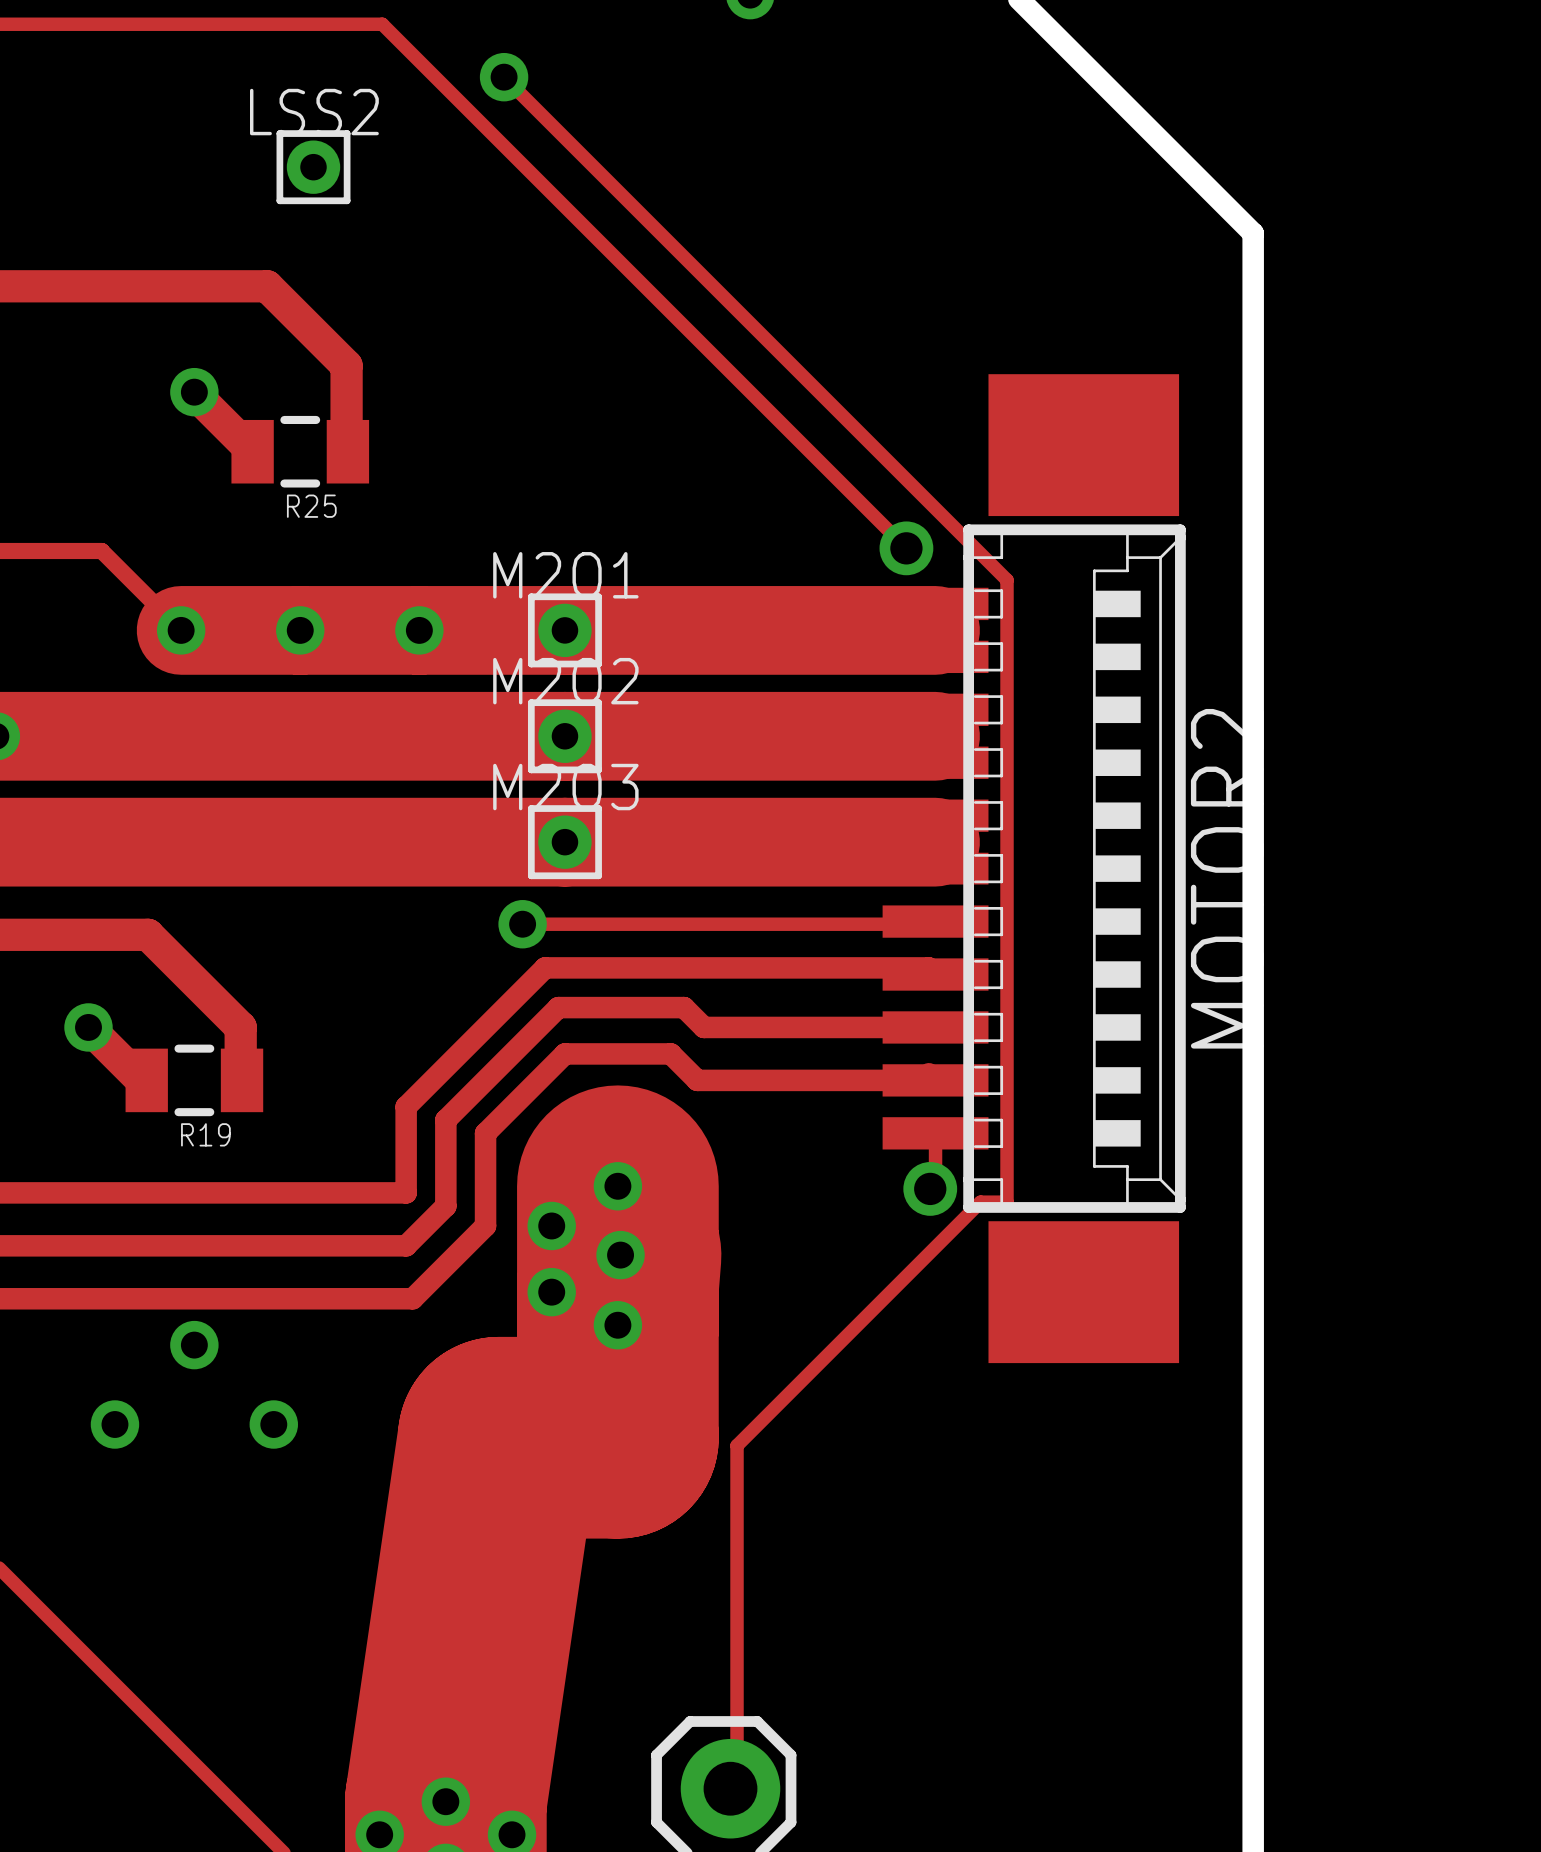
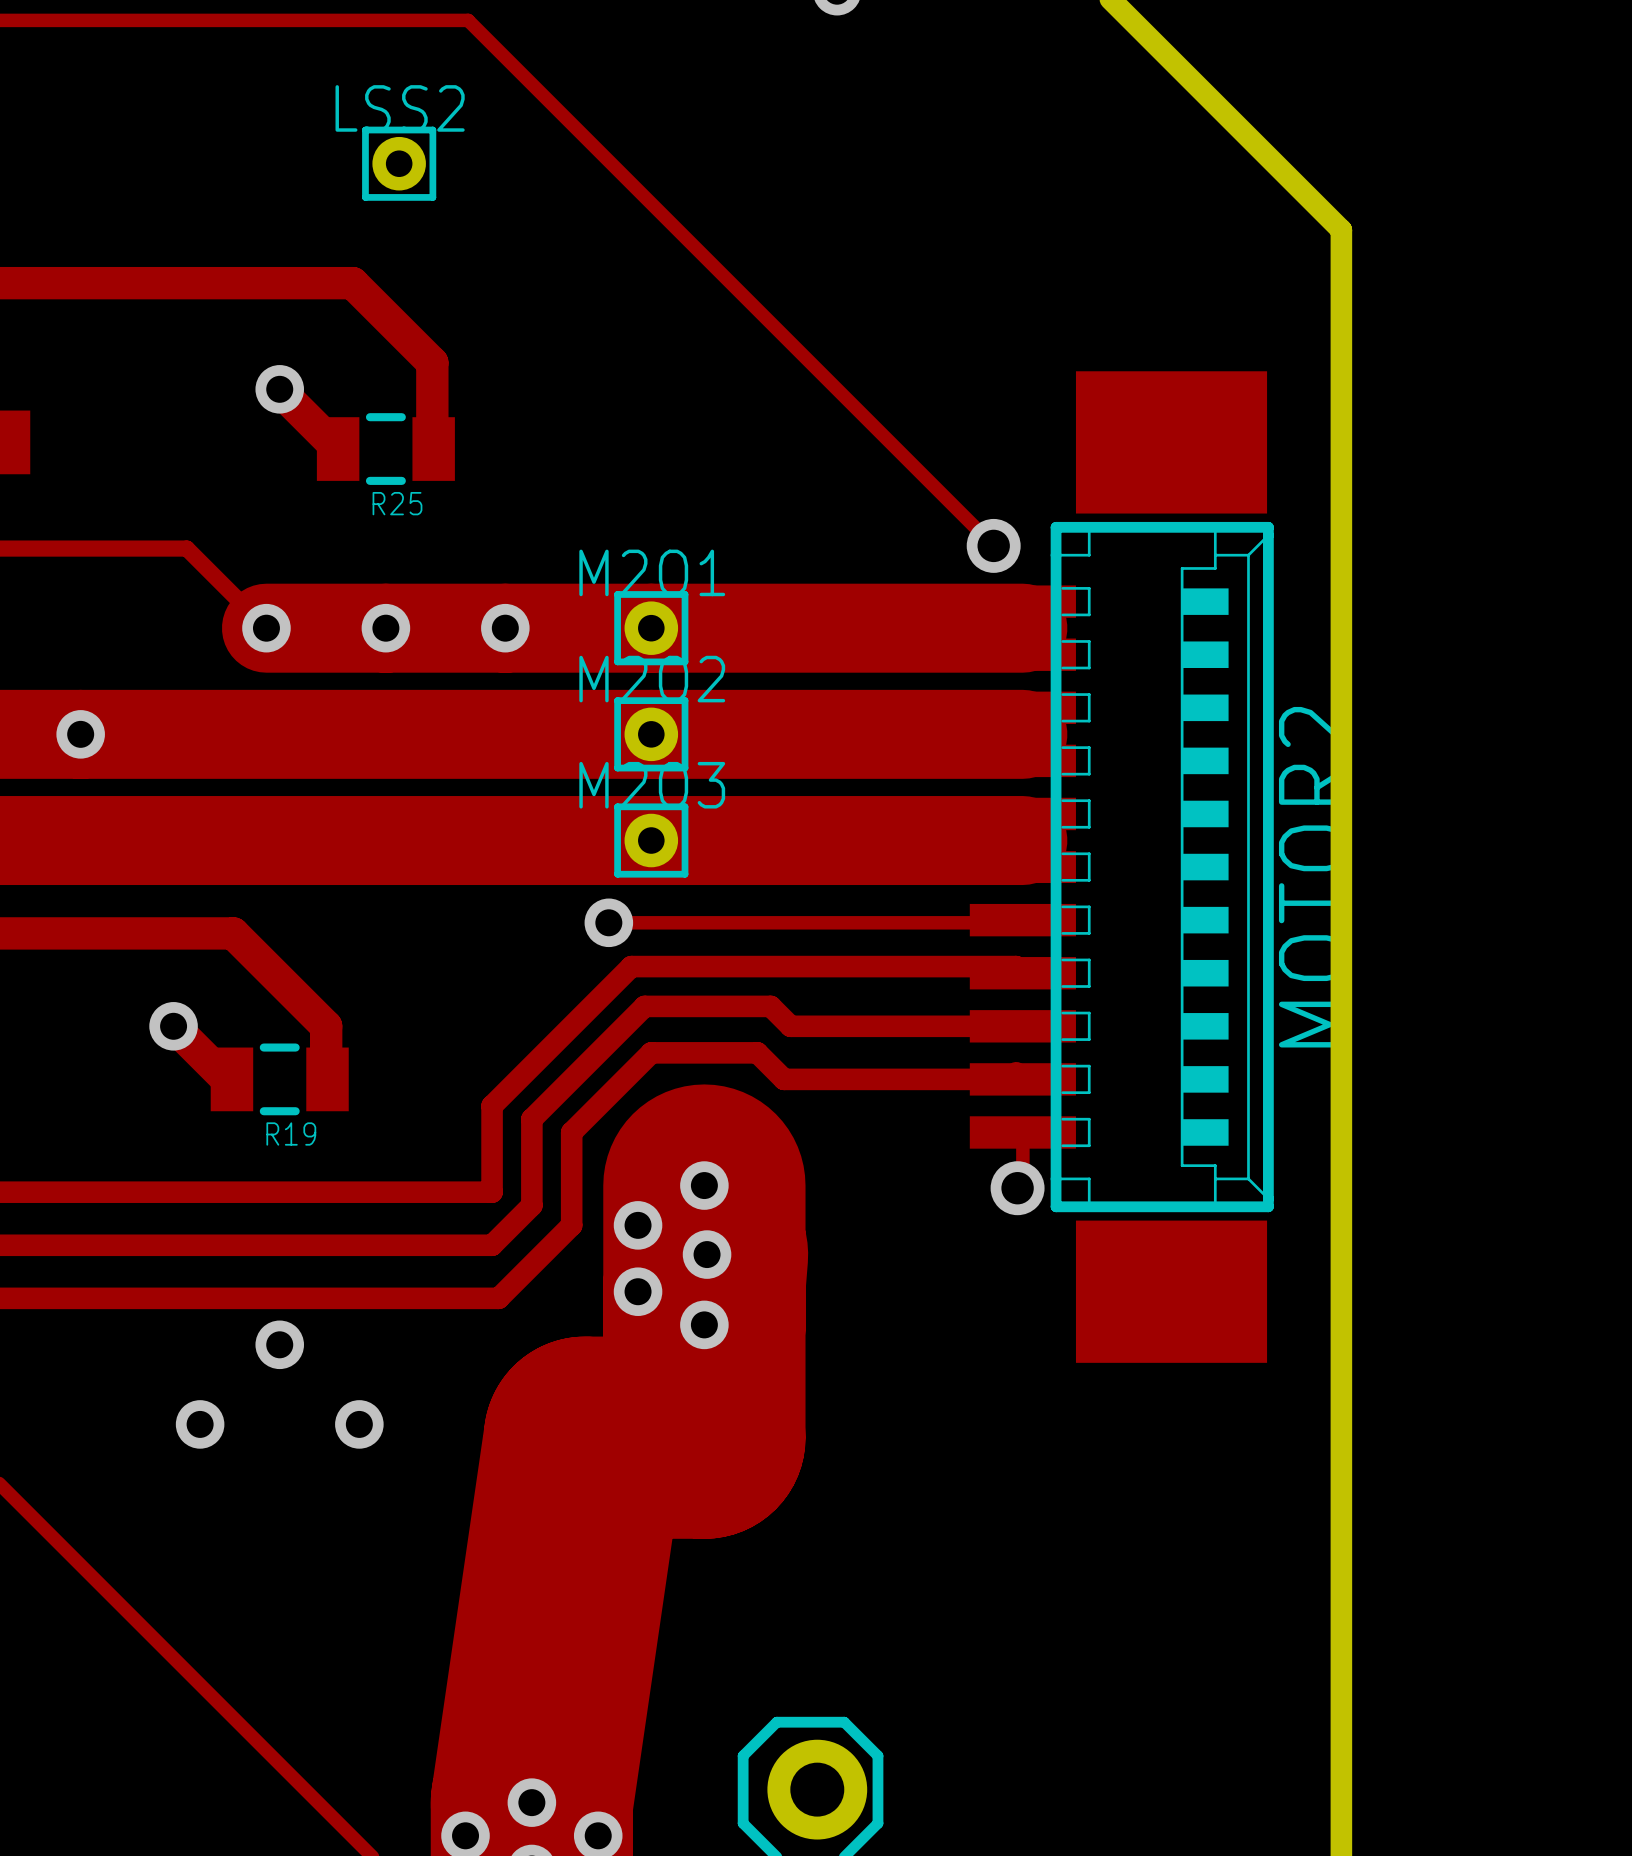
track: (504, 77) (1007, 580) (1007, 1202) (980, 1202) (737, 1445) (737, 1787) (730, 1788) -> none
via: (504, 77) -> none

